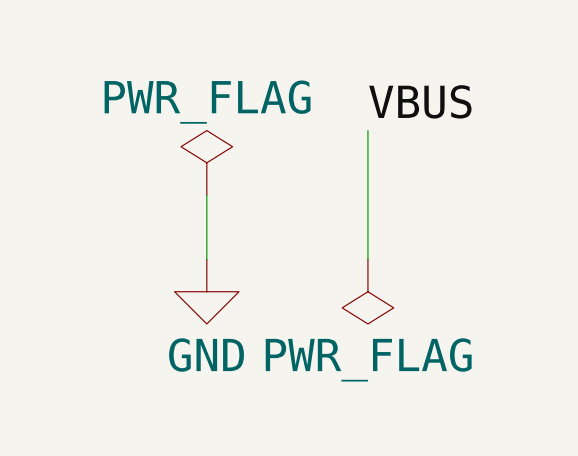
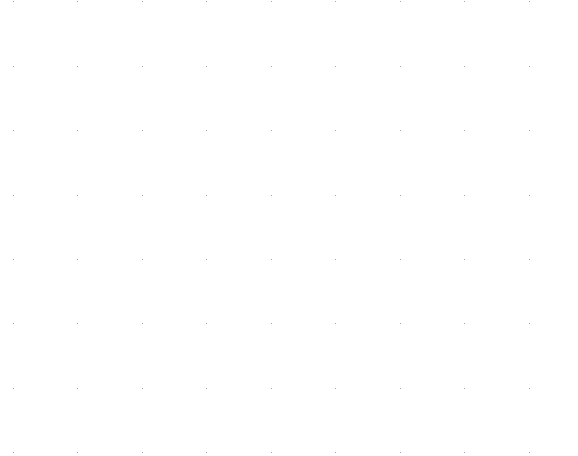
label: VBUS (420, 101) -> none
wire: (367, 130) (367, 259) -> none
power symbol: PWR_FLAG (206, 162) -> none
wire: (206, 195) (206, 259) -> none
power symbol: GND (206, 291) -> none
power symbol: PWR_FLAG (367, 291) -> none

